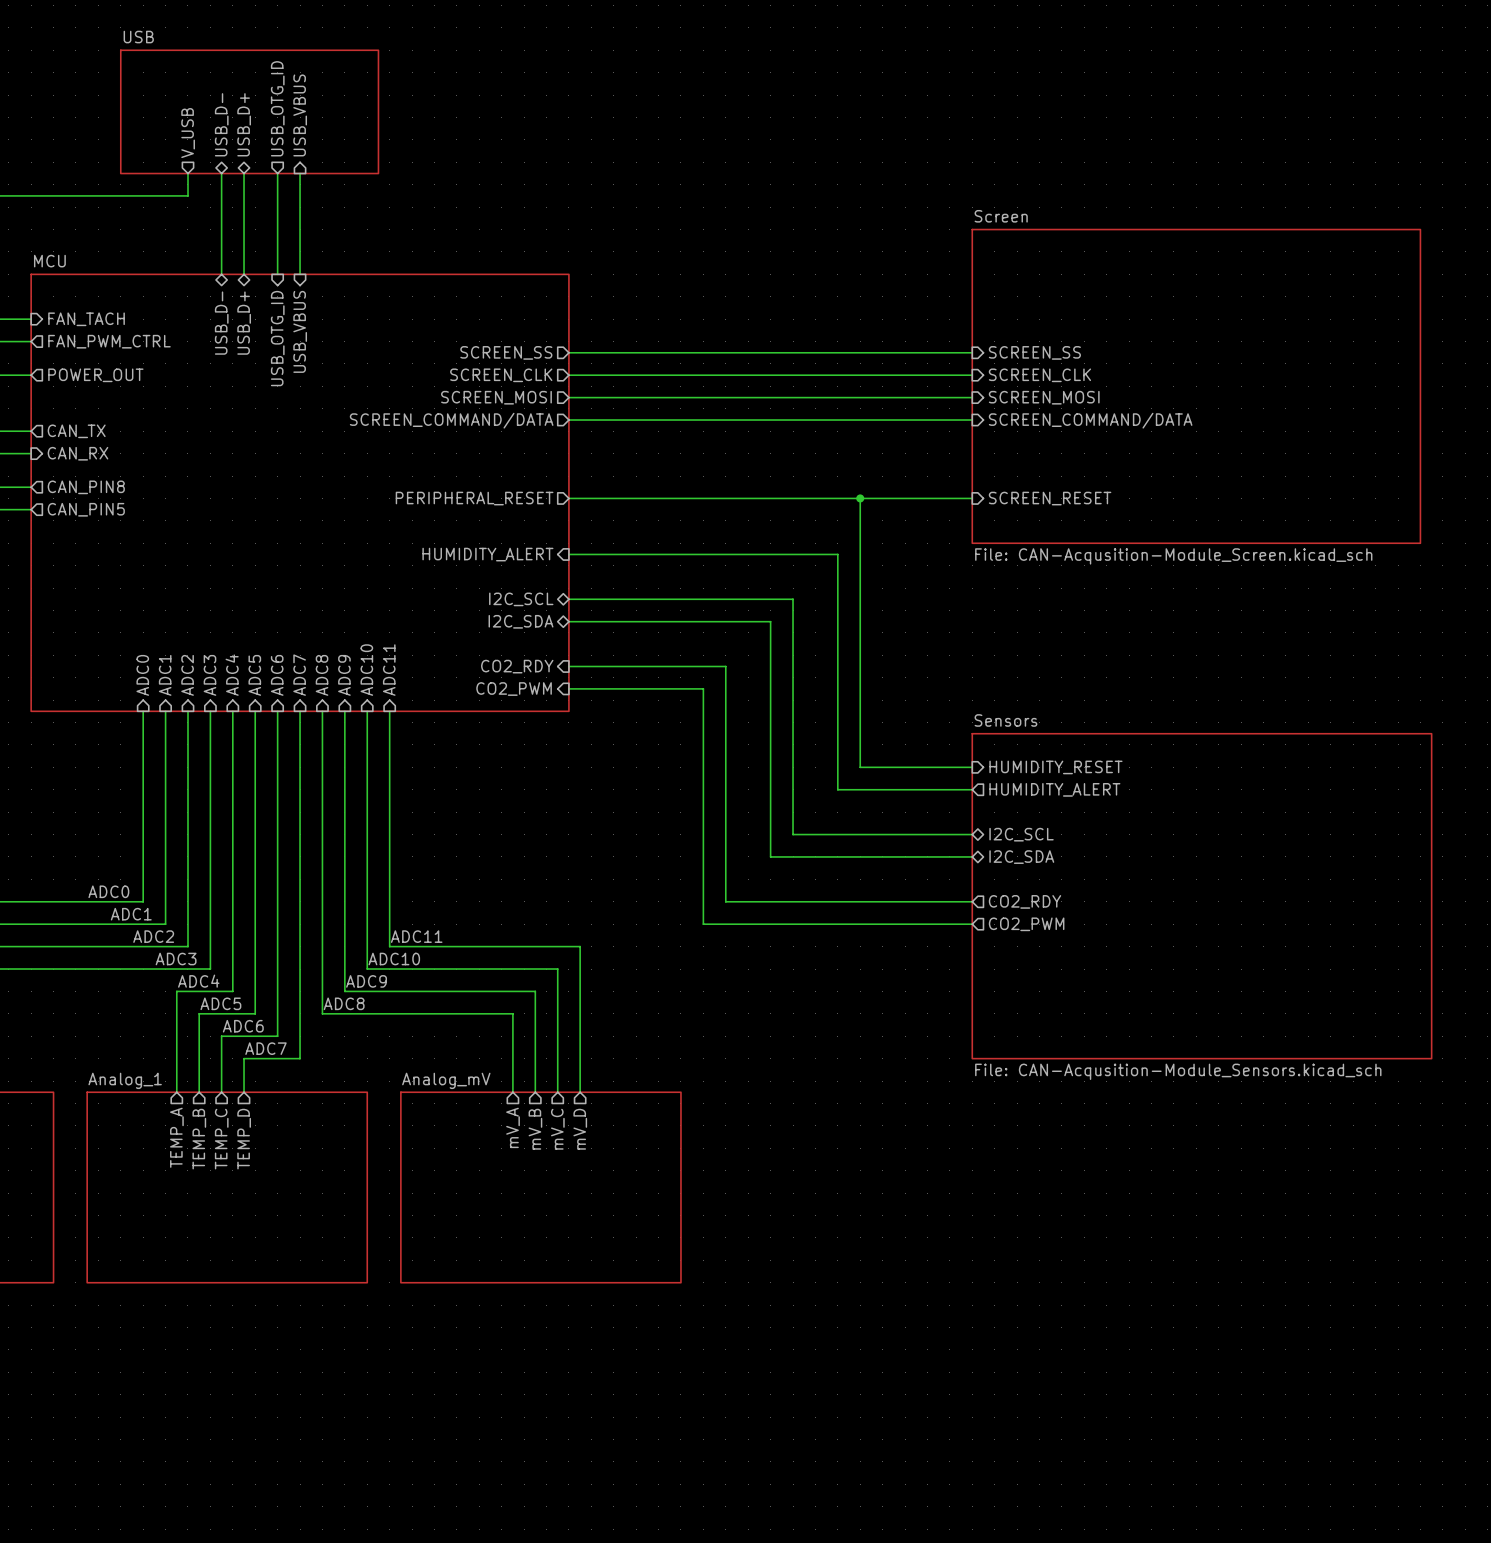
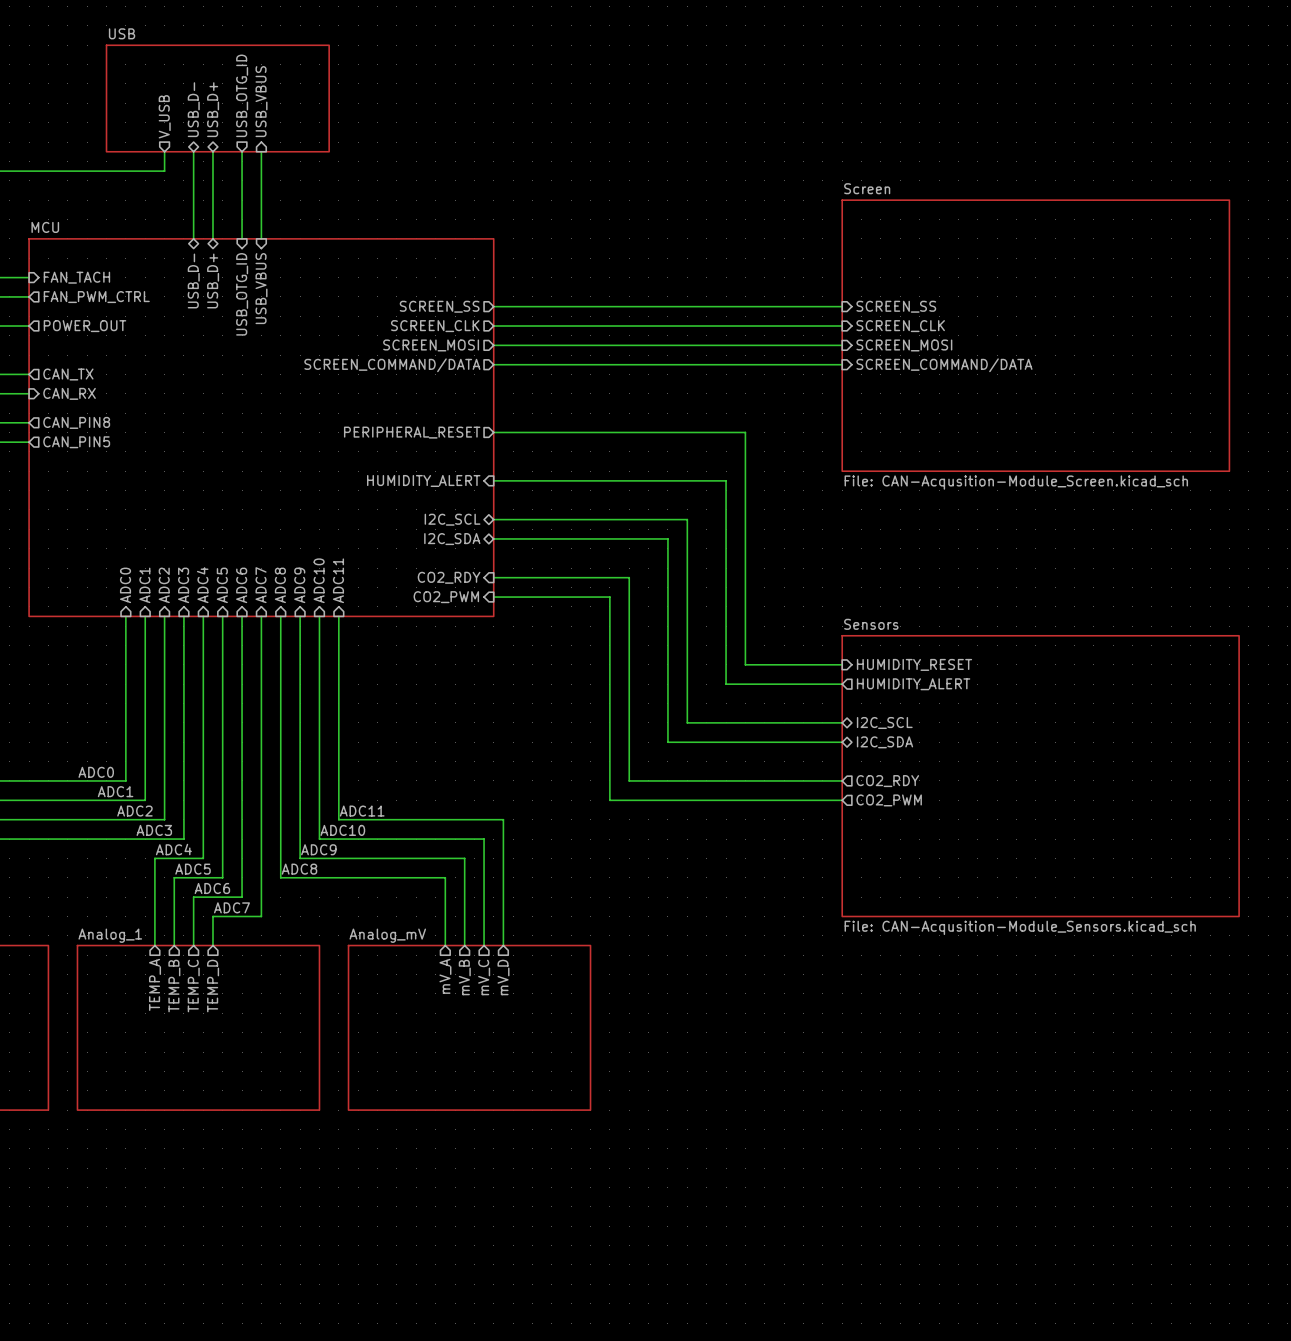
wire: (860, 498) (972, 498) -> none
junction: (860, 498) -> none
sheet pin: SCREEN_RESET (1050, 498) -> none

